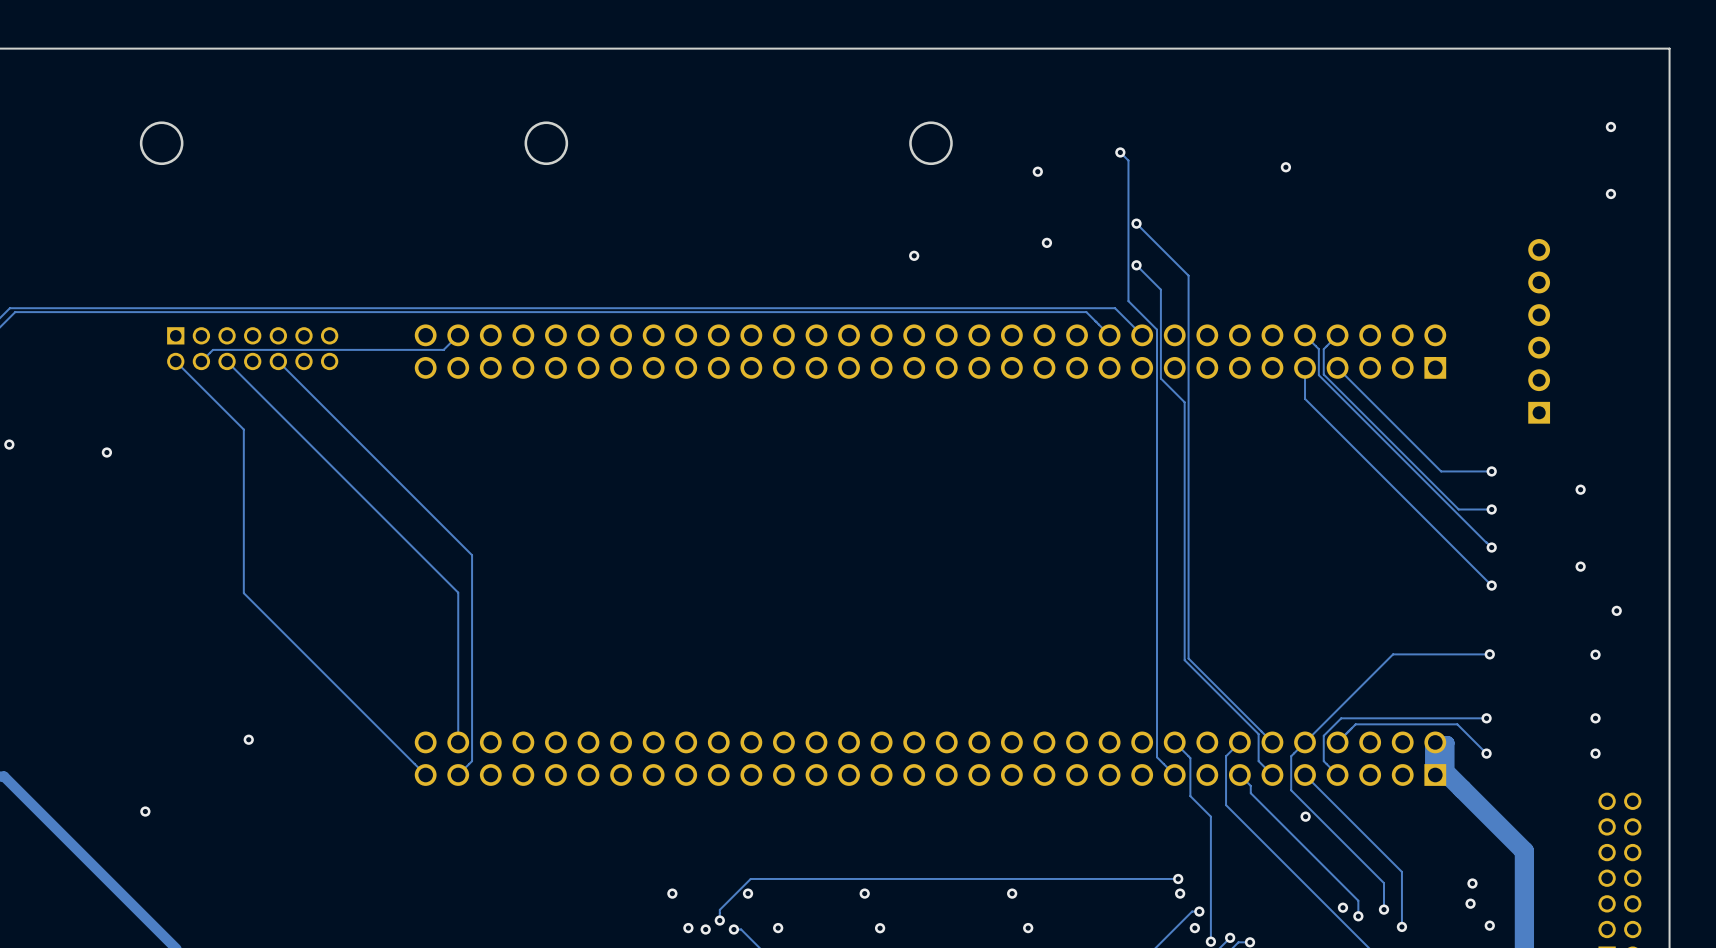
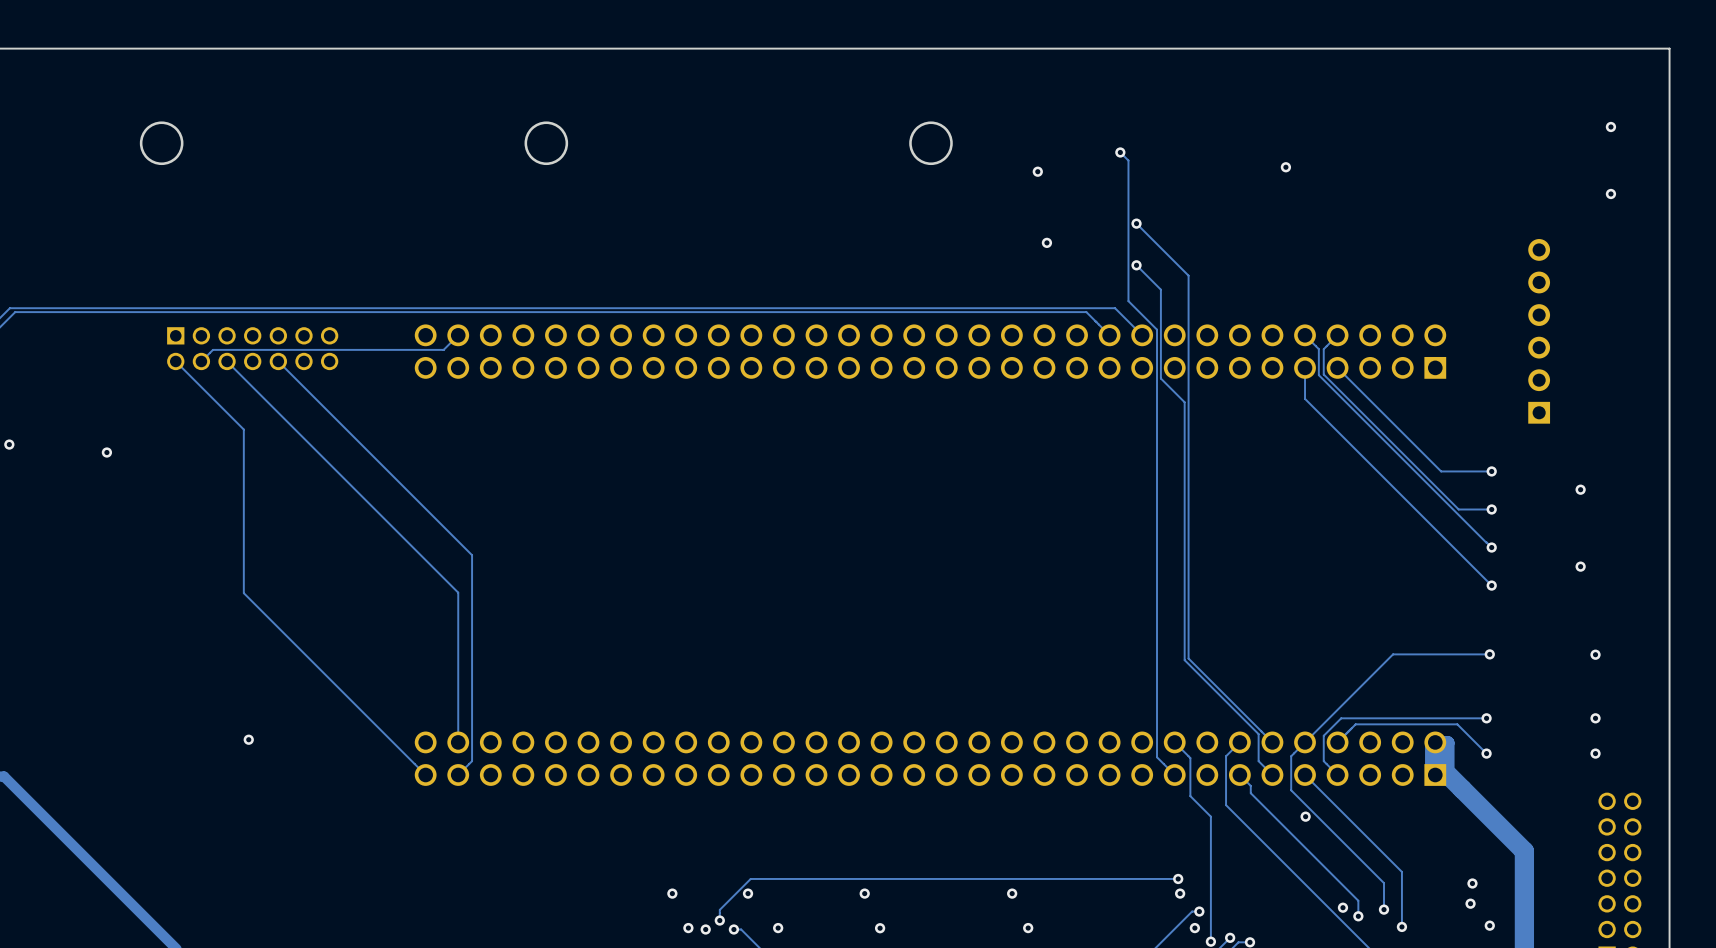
via: (914, 255) -> none
via: (1616, 610) -> none
via: (145, 811) -> none

